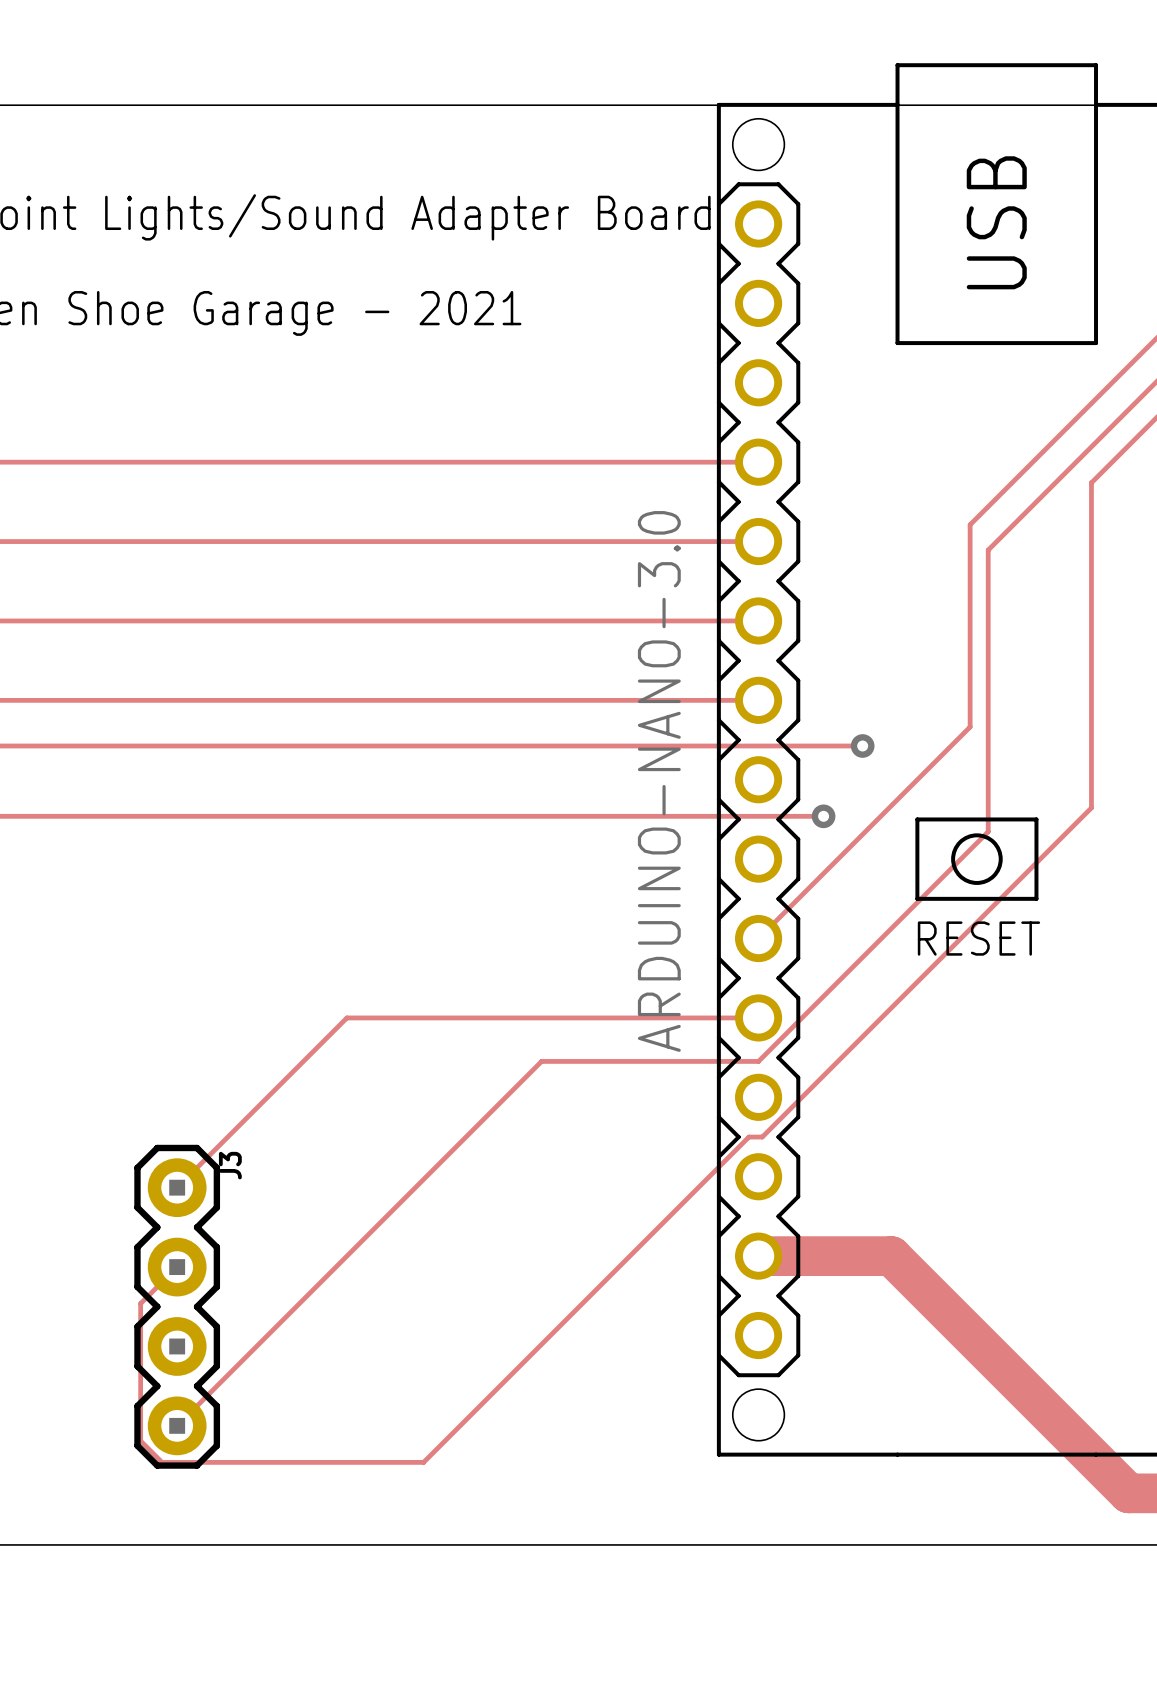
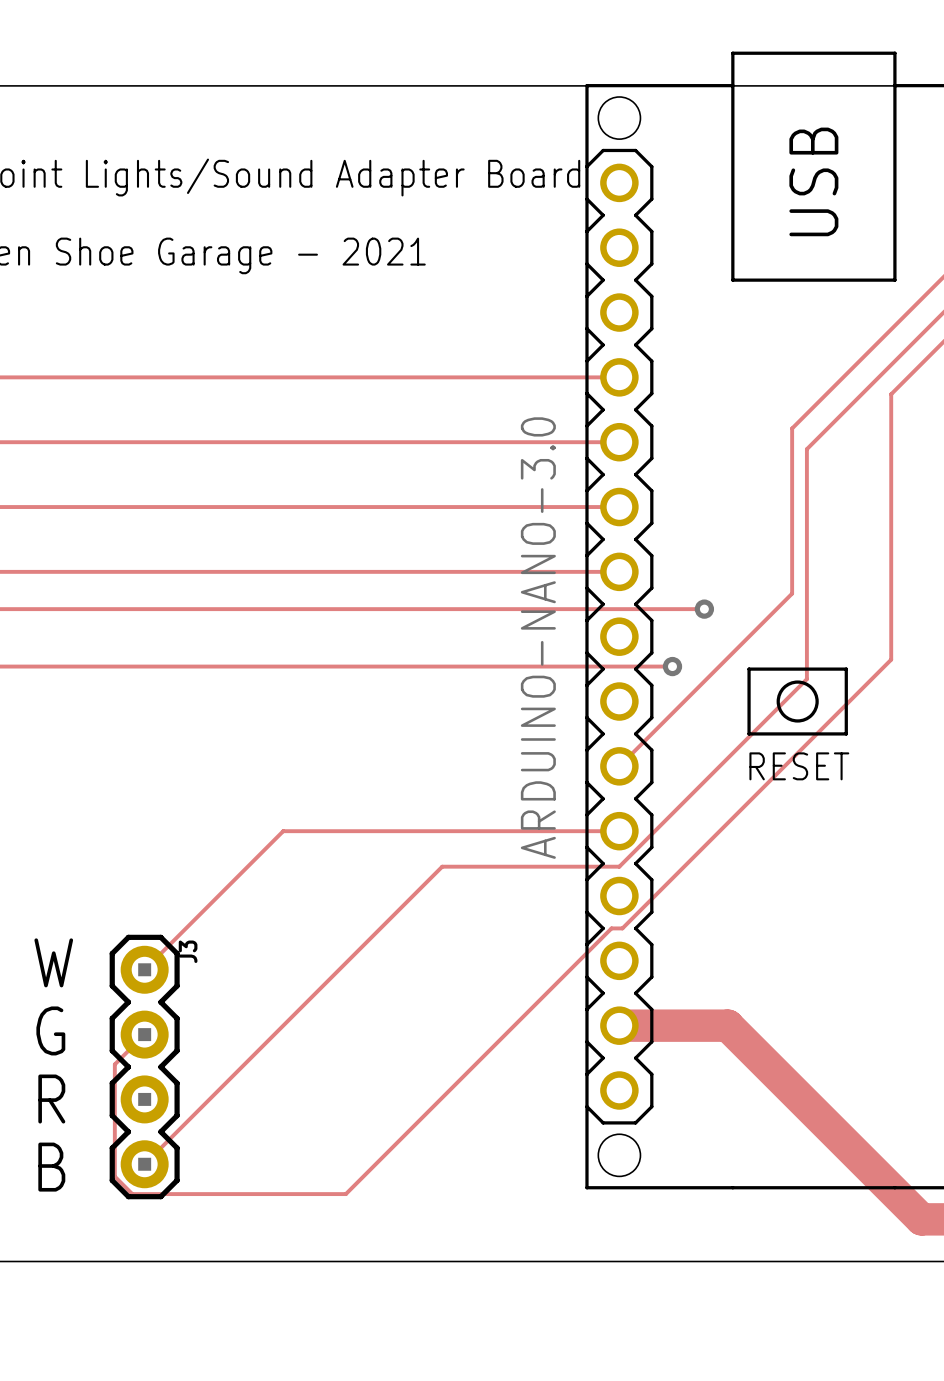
text: none -> W (53, 962)
text: none -> G (50, 1030)
text: none -> R (51, 1099)
text: none -> B (51, 1167)

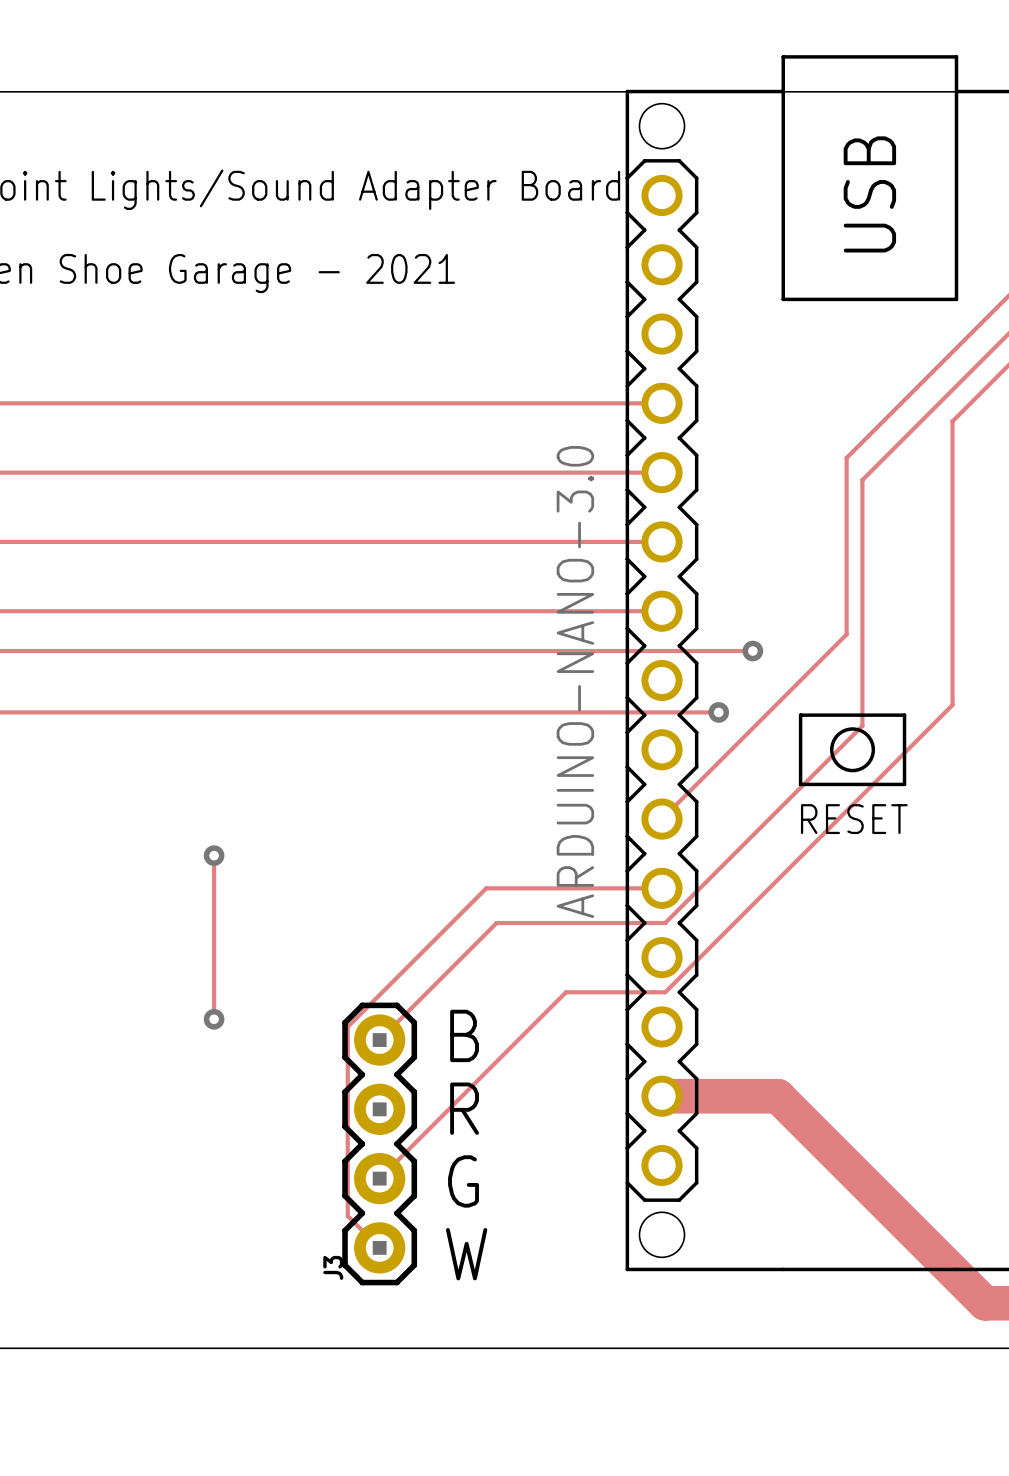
track: none -> (214, 855) (214, 1019)
via: none -> (214, 855)
track: (454, 831) (283, 831) (144, 969) -> (486, 888) (347, 1026) (347, 1216) (379, 1247)
track: (622, 863) (619, 866) (442, 866) (144, 1164) -> (665, 923) (496, 923) (379, 1040)
track: (611, 928) (345, 1194) (132, 1194) (114, 1176) (114, 1064) (144, 1034) -> (653, 992) (565, 992) (379, 1178)
J3 name position: J3 (188, 951) -> J3 (333, 1267)
via: none -> (214, 1019)
text position: W (53, 962) -> W (466, 1254)
text position: G (50, 1030) -> G (463, 1181)
J3 position: (144, 1067) -> (379, 1143)
text position: R (51, 1099) -> R (464, 1108)
text position: B (51, 1167) -> B (464, 1035)

